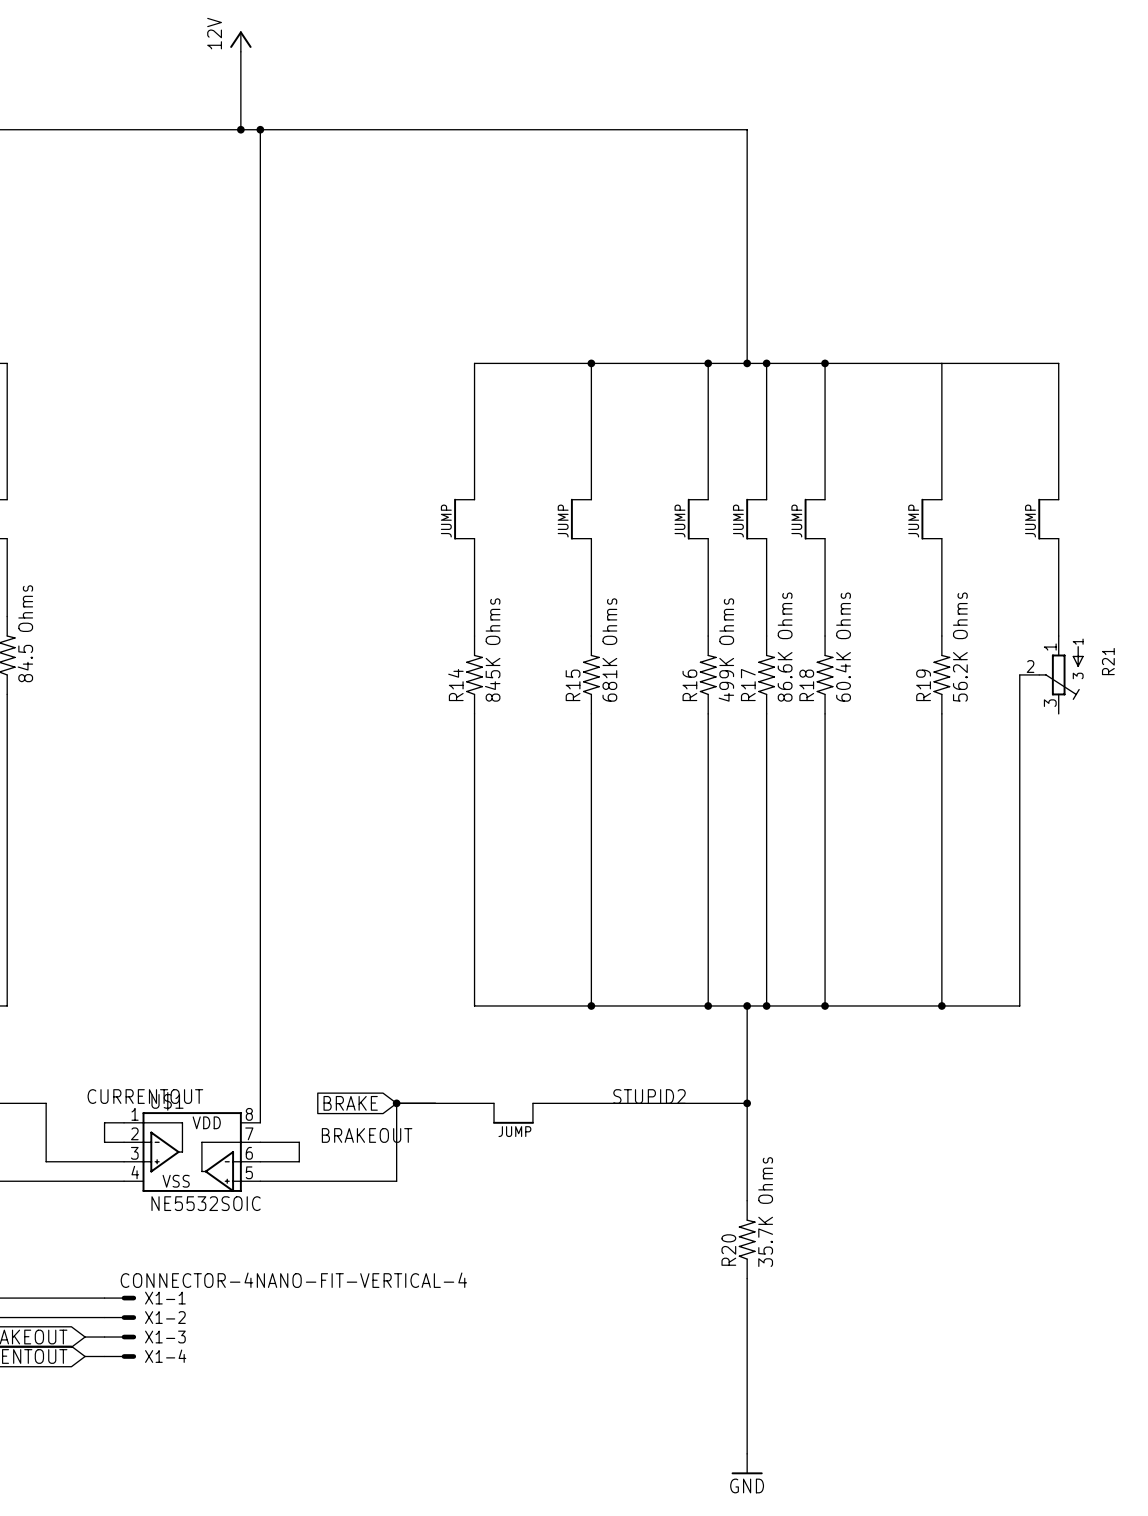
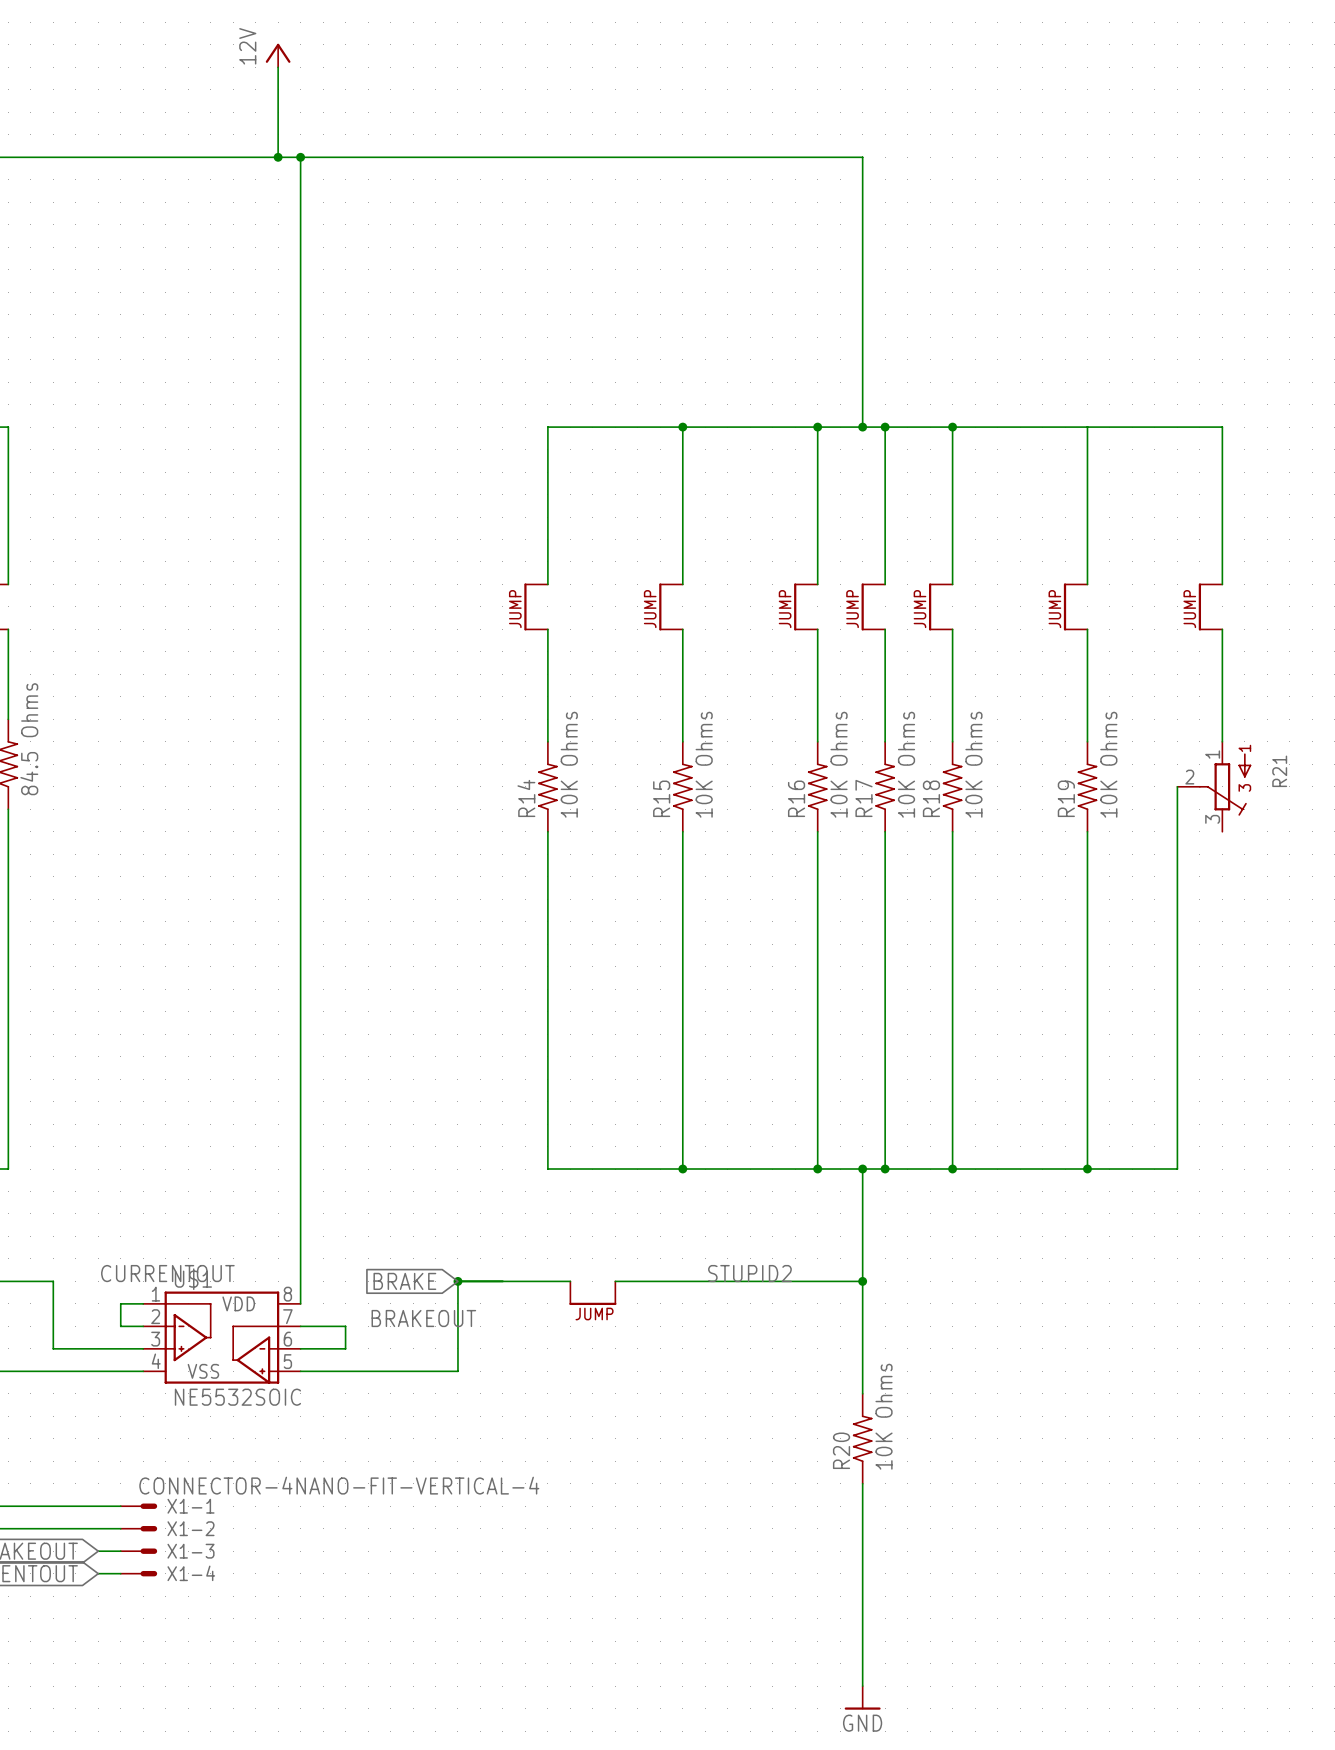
R17 value: 86.6K Ohms (785, 647) -> 10K Ohms (906, 764)
R18 value: 60.4K Ohms (843, 647) -> 10K Ohms (973, 764)
R19 value: 56.2K Ohms (960, 647) -> 10K Ohms (1108, 764)
R14 value: 845K Ohms (492, 649) -> 10K Ohms (569, 764)
R15 value: 681K Ohms (609, 649) -> 10K Ohms (704, 764)
R16 value: 499K Ohms (726, 649) -> 10K Ohms (839, 764)
R20 value: 35.7K Ohms (765, 1212) -> 10K Ohms (884, 1416)

